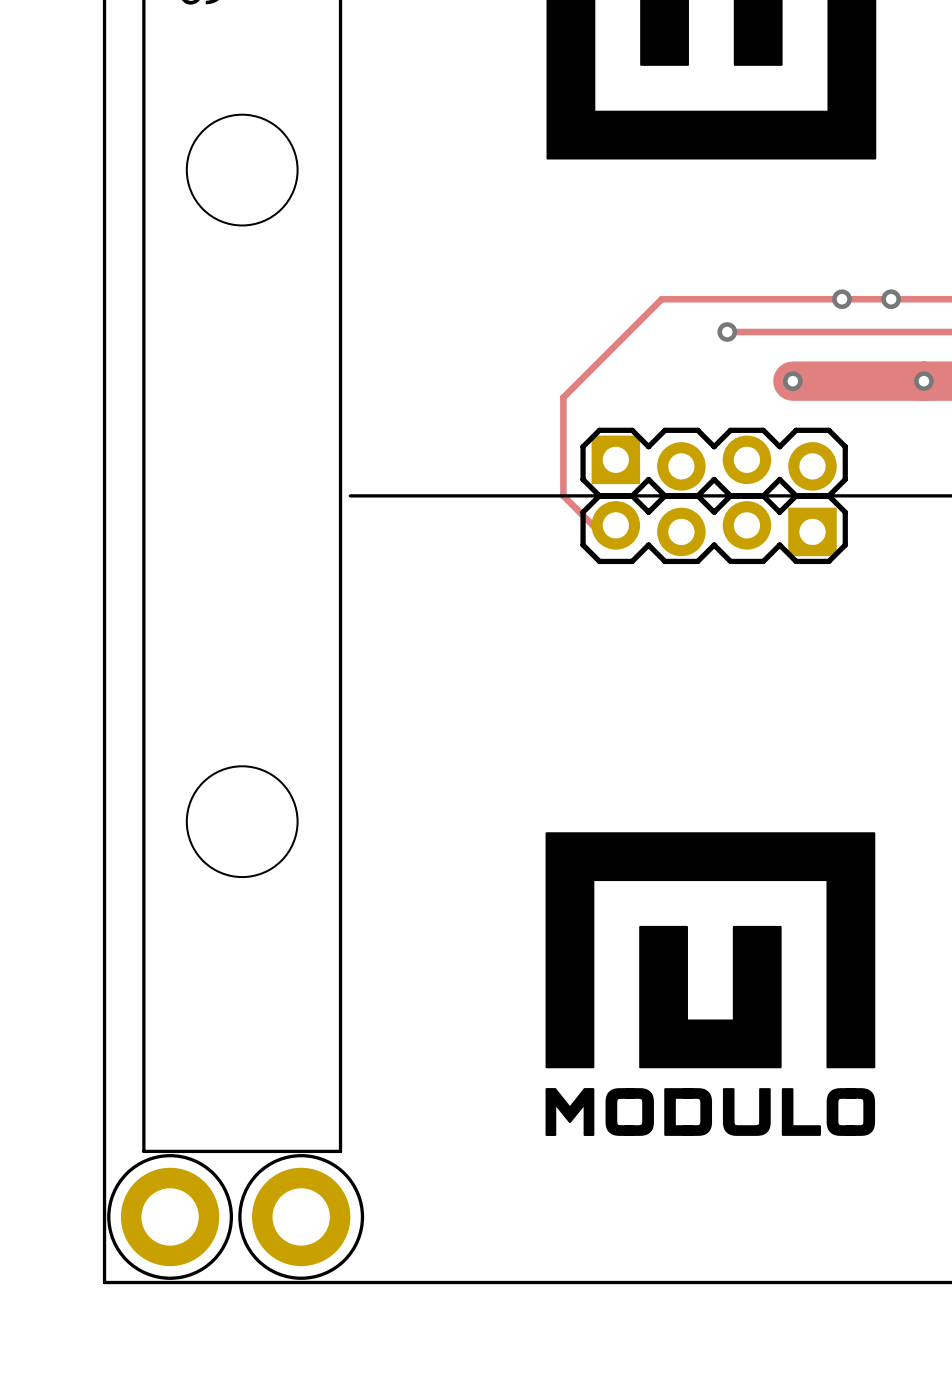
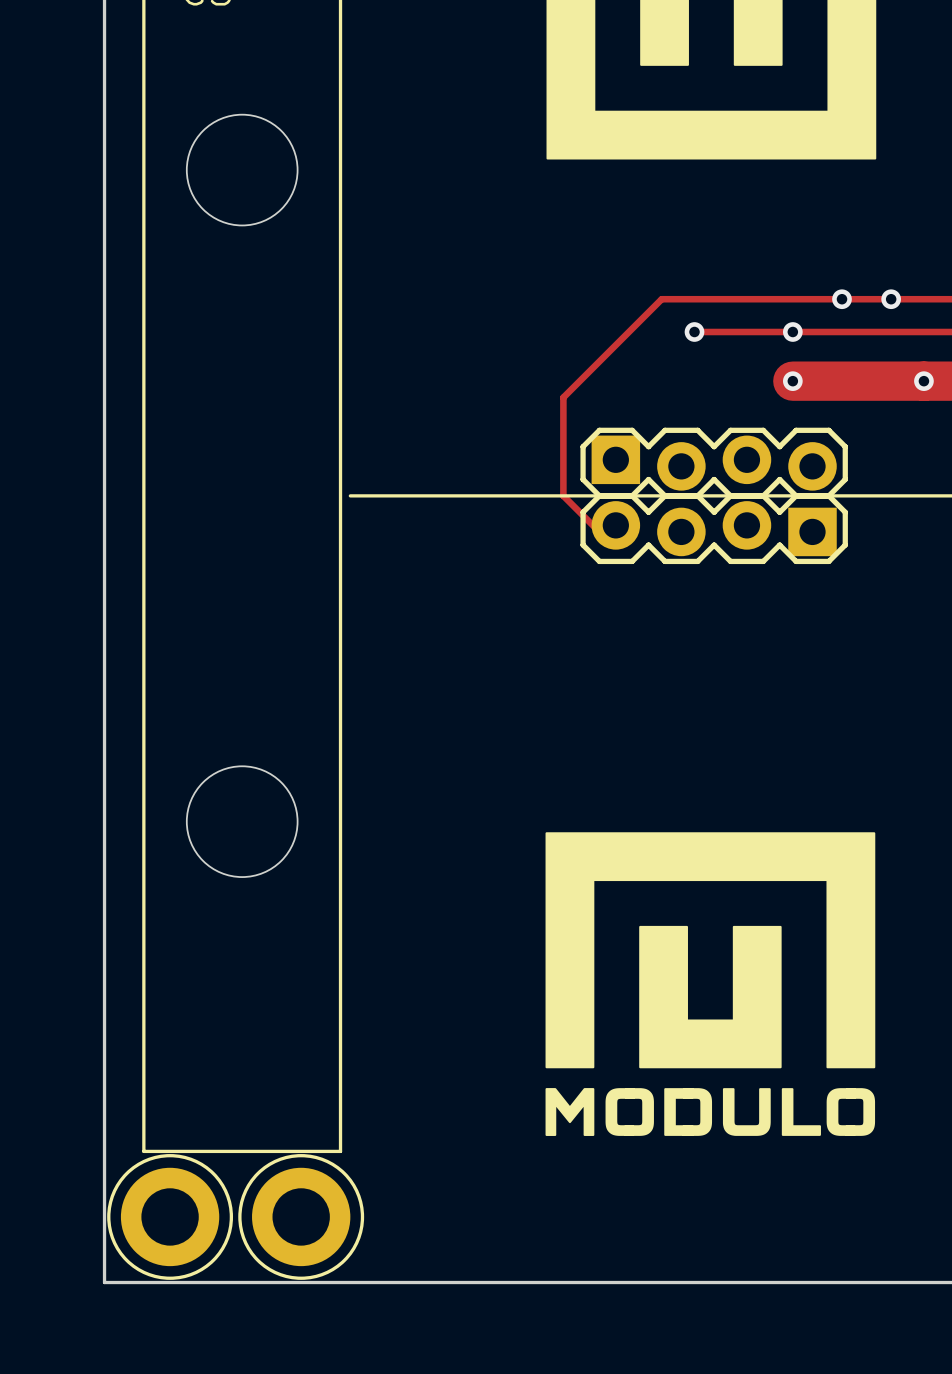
track: none -> (694, 331) (727, 331)
via: none -> (694, 331)
via: (727, 331) -> none
via: none -> (792, 331)

